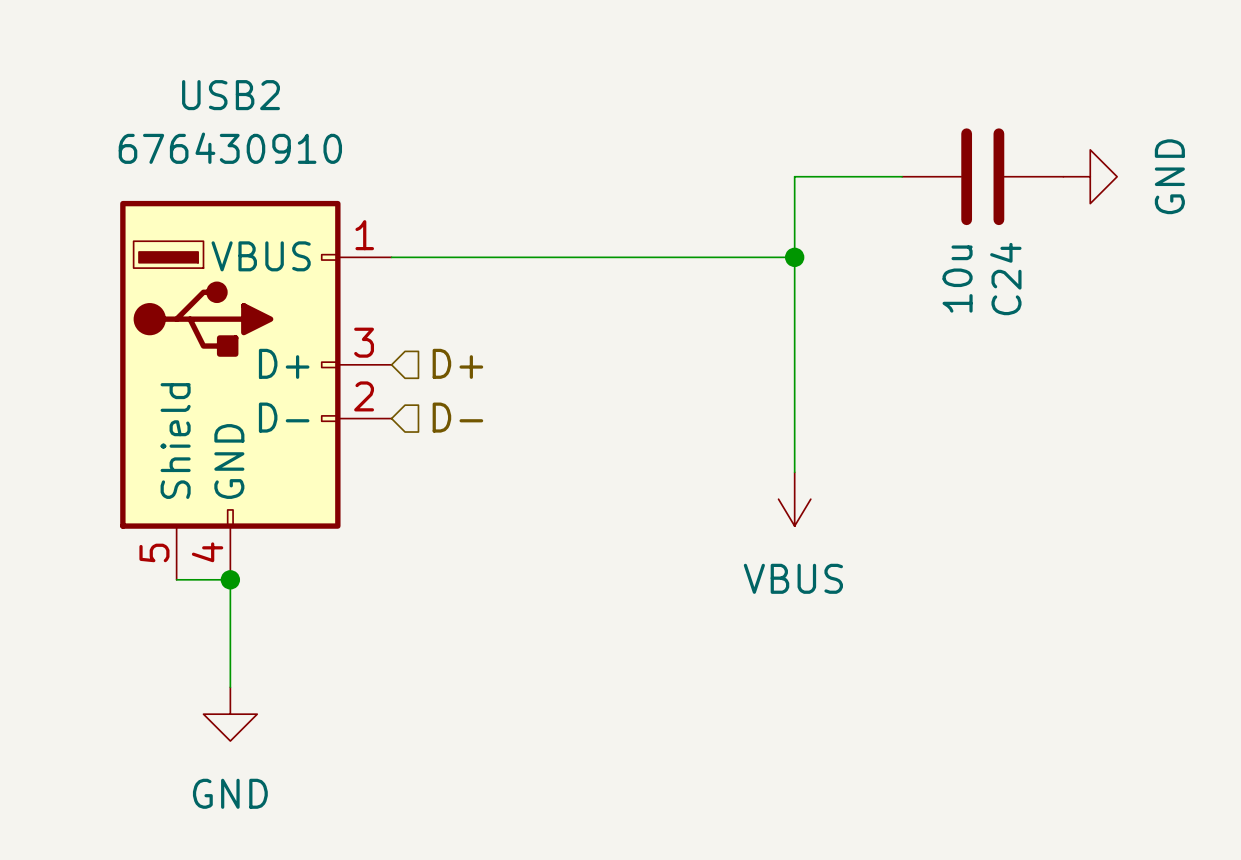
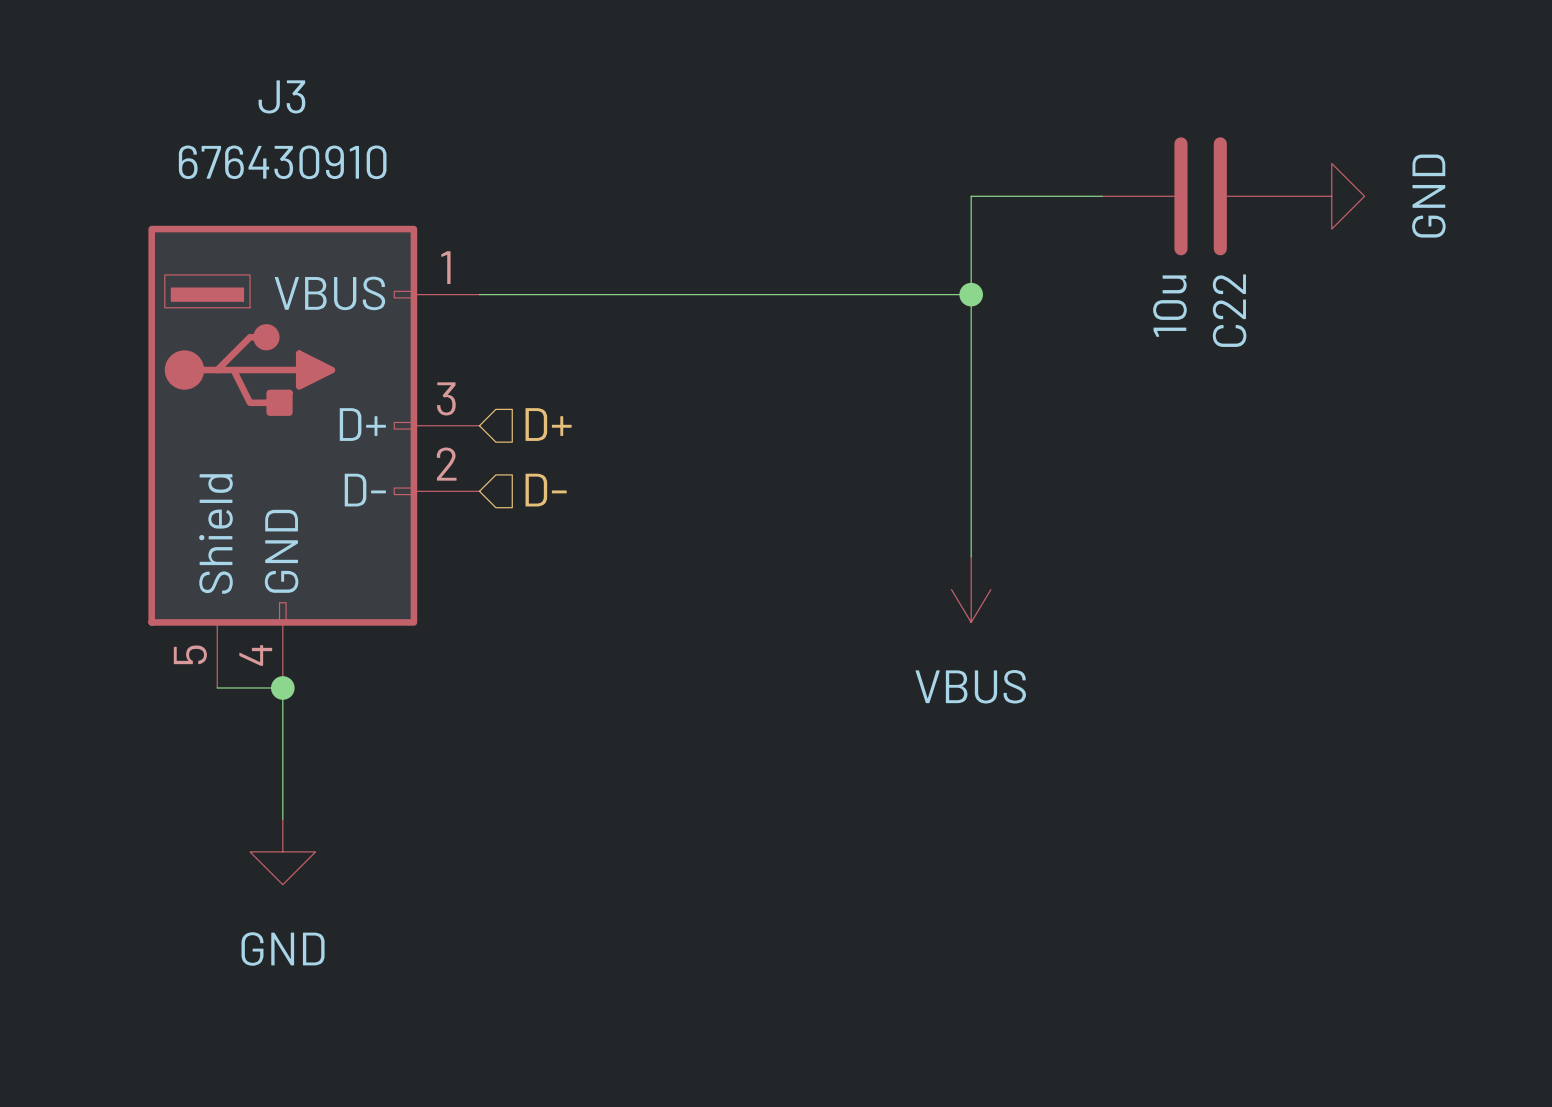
USB2 name: USB2 (231, 95) -> J3 (281, 96)
C24 name: C24 (1005, 279) -> C22 (1229, 310)

